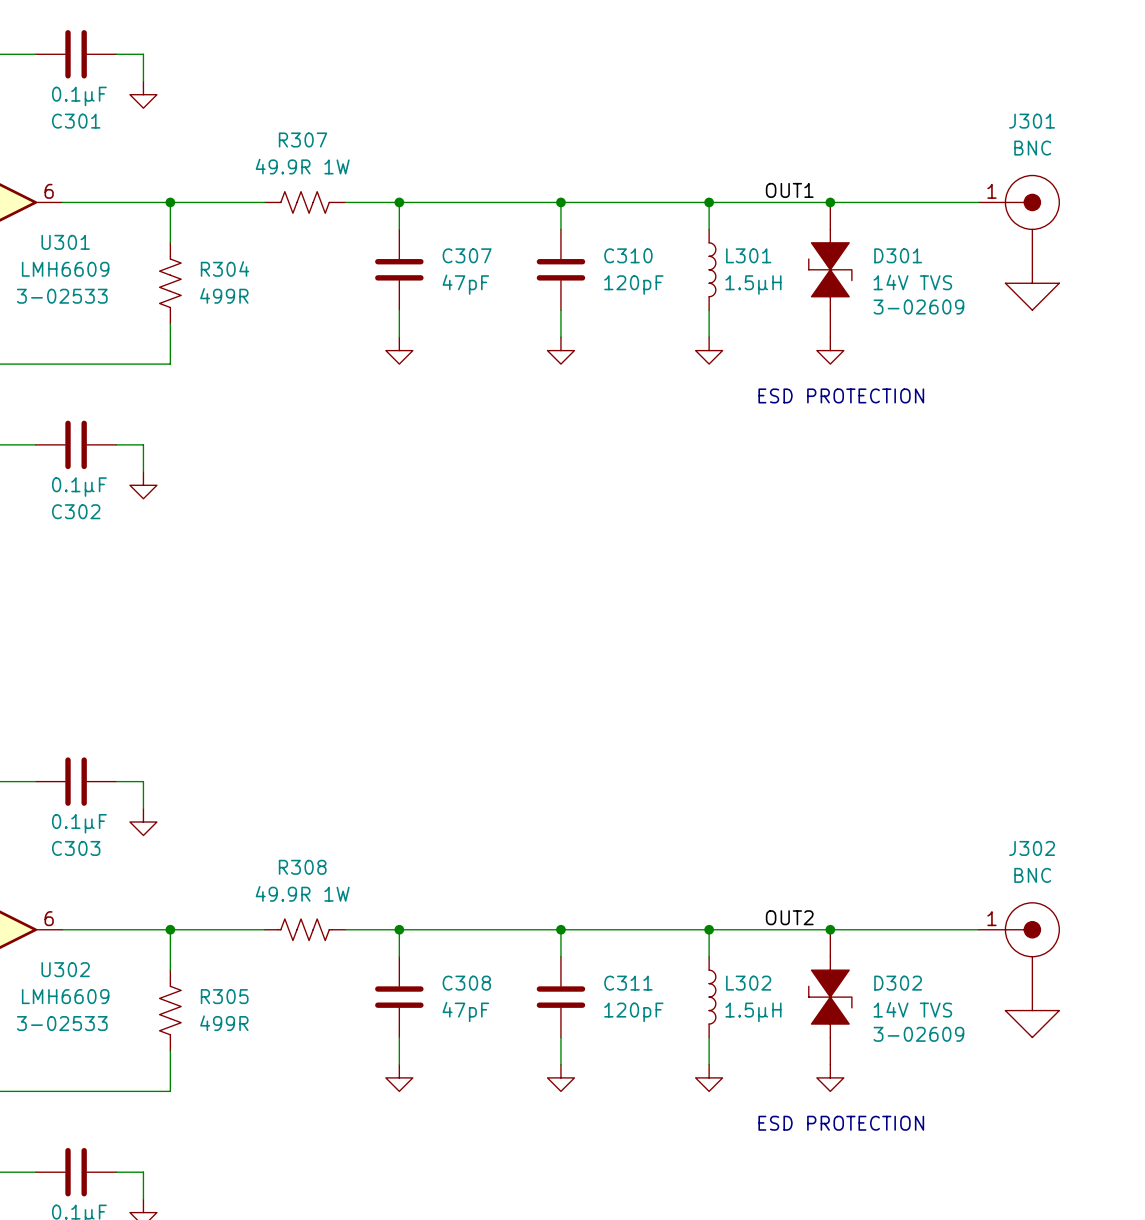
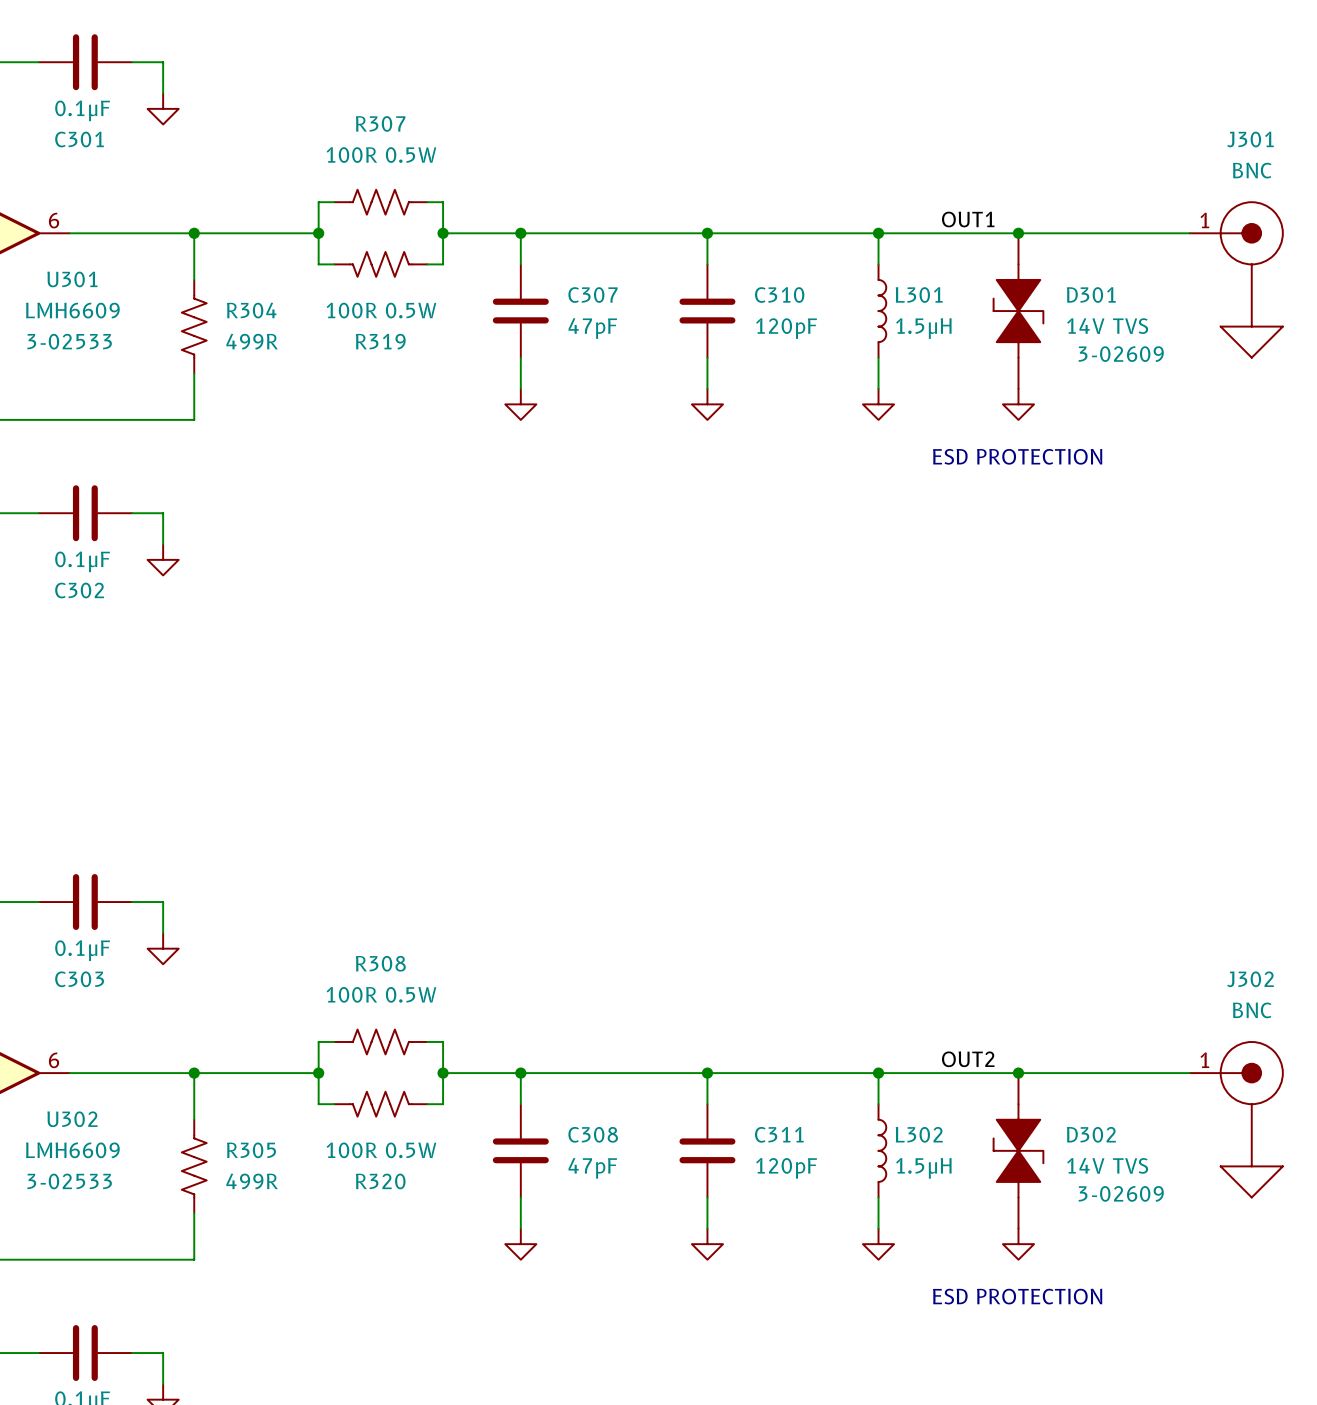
R307 name position: R307 (303, 139) -> R307 (380, 123)
R307 value: 49.9R 1W (302, 166) -> 100R 0.5W (381, 155)
wire: none -> (334, 202) (318, 202) (318, 264) (334, 264)
wire: none -> (427, 202) (443, 202) (443, 264) (427, 264)
label position: OUT1 (789, 190) -> OUT1 (968, 219)
junction: none -> (318, 233)
R307 position: (305, 202) -> (380, 202)
wire: (345, 202) (385, 202) -> none
wire: (399, 202) (399, 229) -> (520, 233) (520, 264)
junction position: (399, 202) -> (443, 233)
junction: none -> (520, 233)
wire: (560, 202) (560, 229) -> (707, 233) (707, 264)
junction: (560, 202) -> none
junction: none -> (707, 233)
wire: (709, 202) (709, 229) -> (878, 233) (878, 264)
junction: (709, 202) -> none
junction: none -> (878, 233)
junction: (830, 202) -> none
junction: none -> (1018, 233)
R319: none -> 100R 0.5W (380, 264)
J301 position: (1018, 242) -> (1236, 279)
C307 position: (399, 269) -> (520, 311)
C310 position: (560, 269) -> (707, 311)
L301 position: (712, 269) -> (882, 311)
D301 position: (830, 269) -> (1018, 311)
wire: (399, 310) (399, 337) -> (520, 357) (520, 388)
wire: (560, 310) (560, 337) -> (707, 357) (707, 388)
wire: (709, 310) (709, 337) -> (878, 357) (878, 388)
power symbol: (399, 350) -> none
power symbol: none -> (520, 404)
power symbol: (560, 350) -> none
power symbol: none -> (707, 404)
power symbol: (709, 350) -> none
power symbol: none -> (878, 404)
power symbol: (830, 350) -> none
power symbol: none -> (1018, 404)
text position: ESD PROTECTION (841, 395) -> ESD PROTECTION (1017, 456)
R308 name position: R308 (302, 867) -> R308 (380, 963)
R308 value: 49.9R 1W (302, 893) -> 100R 0.5W (381, 994)
wire: none -> (334, 1041) (318, 1041) (318, 1104) (334, 1104)
wire: none -> (427, 1041) (443, 1041) (443, 1104) (427, 1104)
label position: OUT2 (789, 917) -> OUT2 (968, 1059)
junction: none -> (318, 1073)
R308 position: (305, 929) -> (380, 1041)
wire: (345, 929) (385, 929) -> none
wire: (399, 929) (399, 956) -> (520, 1073) (520, 1104)
junction position: (399, 929) -> (443, 1073)
junction: none -> (520, 1073)
wire: (560, 929) (560, 956) -> (707, 1073) (707, 1104)
junction: (560, 929) -> none
junction: none -> (707, 1073)
wire: (709, 929) (709, 956) -> (878, 1073) (878, 1104)
junction: (709, 929) -> none
junction: none -> (878, 1073)
junction: (830, 929) -> none
junction: none -> (1018, 1073)
R320: none -> 100R 0.5W (380, 1104)
J302 position: (1018, 970) -> (1236, 1119)
C308 position: (399, 997) -> (520, 1150)
C311 position: (560, 997) -> (707, 1150)
L302 position: (712, 997) -> (882, 1150)
D302 position: (830, 997) -> (1018, 1150)
wire: (399, 1037) (399, 1064) -> (520, 1197) (520, 1228)
wire: (560, 1037) (560, 1064) -> (707, 1197) (707, 1228)
wire: (709, 1037) (709, 1064) -> (878, 1197) (878, 1228)
power symbol: (399, 1077) -> none
power symbol: none -> (520, 1244)
power symbol: (560, 1077) -> none
power symbol: none -> (707, 1244)
power symbol: (709, 1077) -> none
power symbol: none -> (878, 1244)
power symbol: (830, 1077) -> none
power symbol: none -> (1018, 1244)
text position: ESD PROTECTION (841, 1123) -> ESD PROTECTION (1017, 1296)

